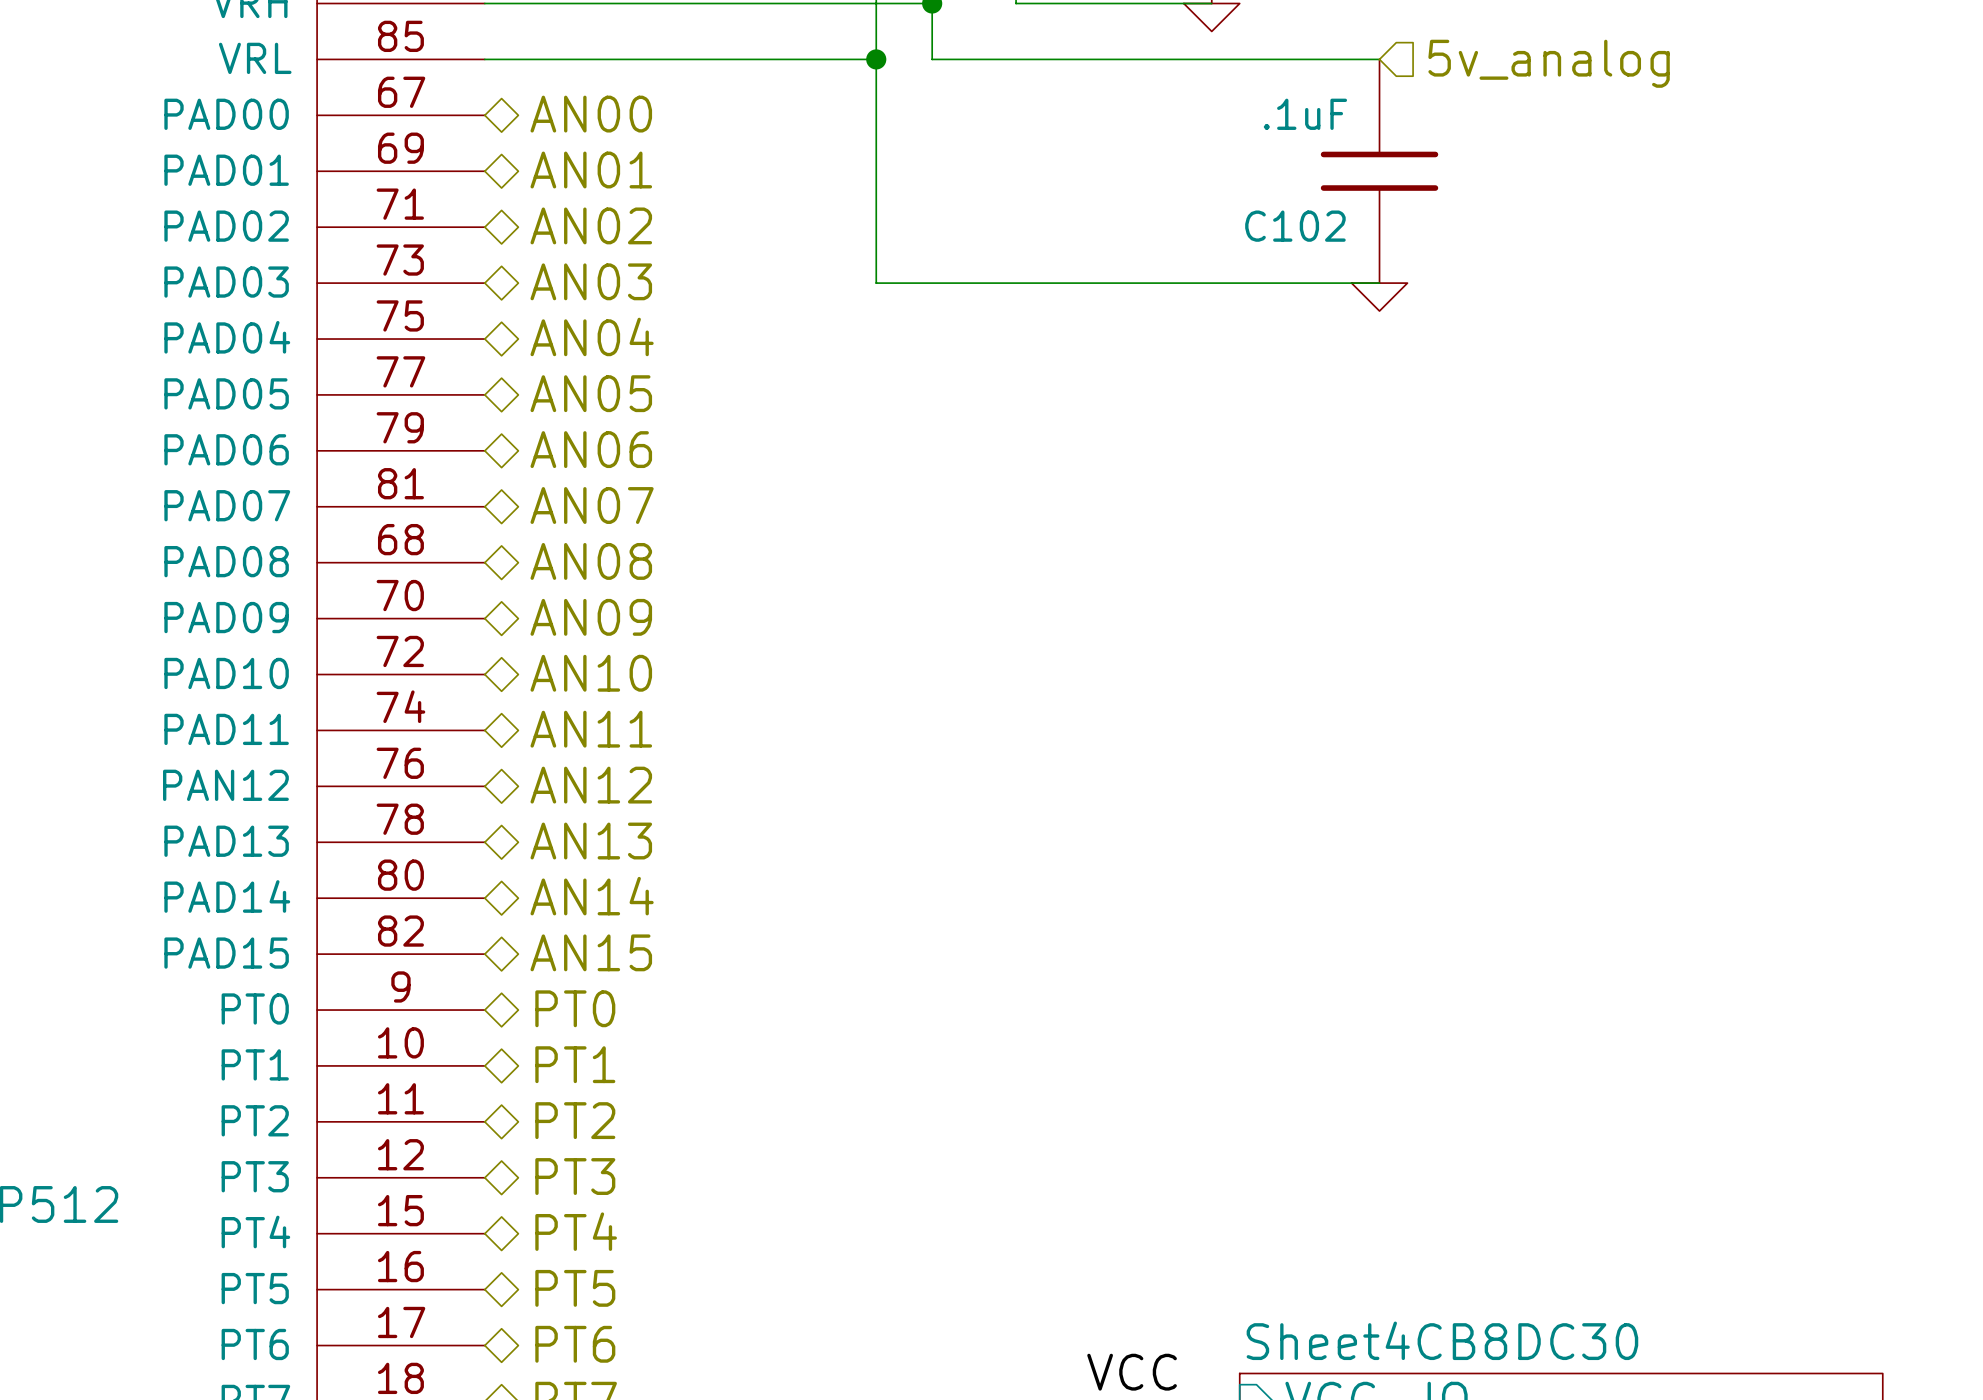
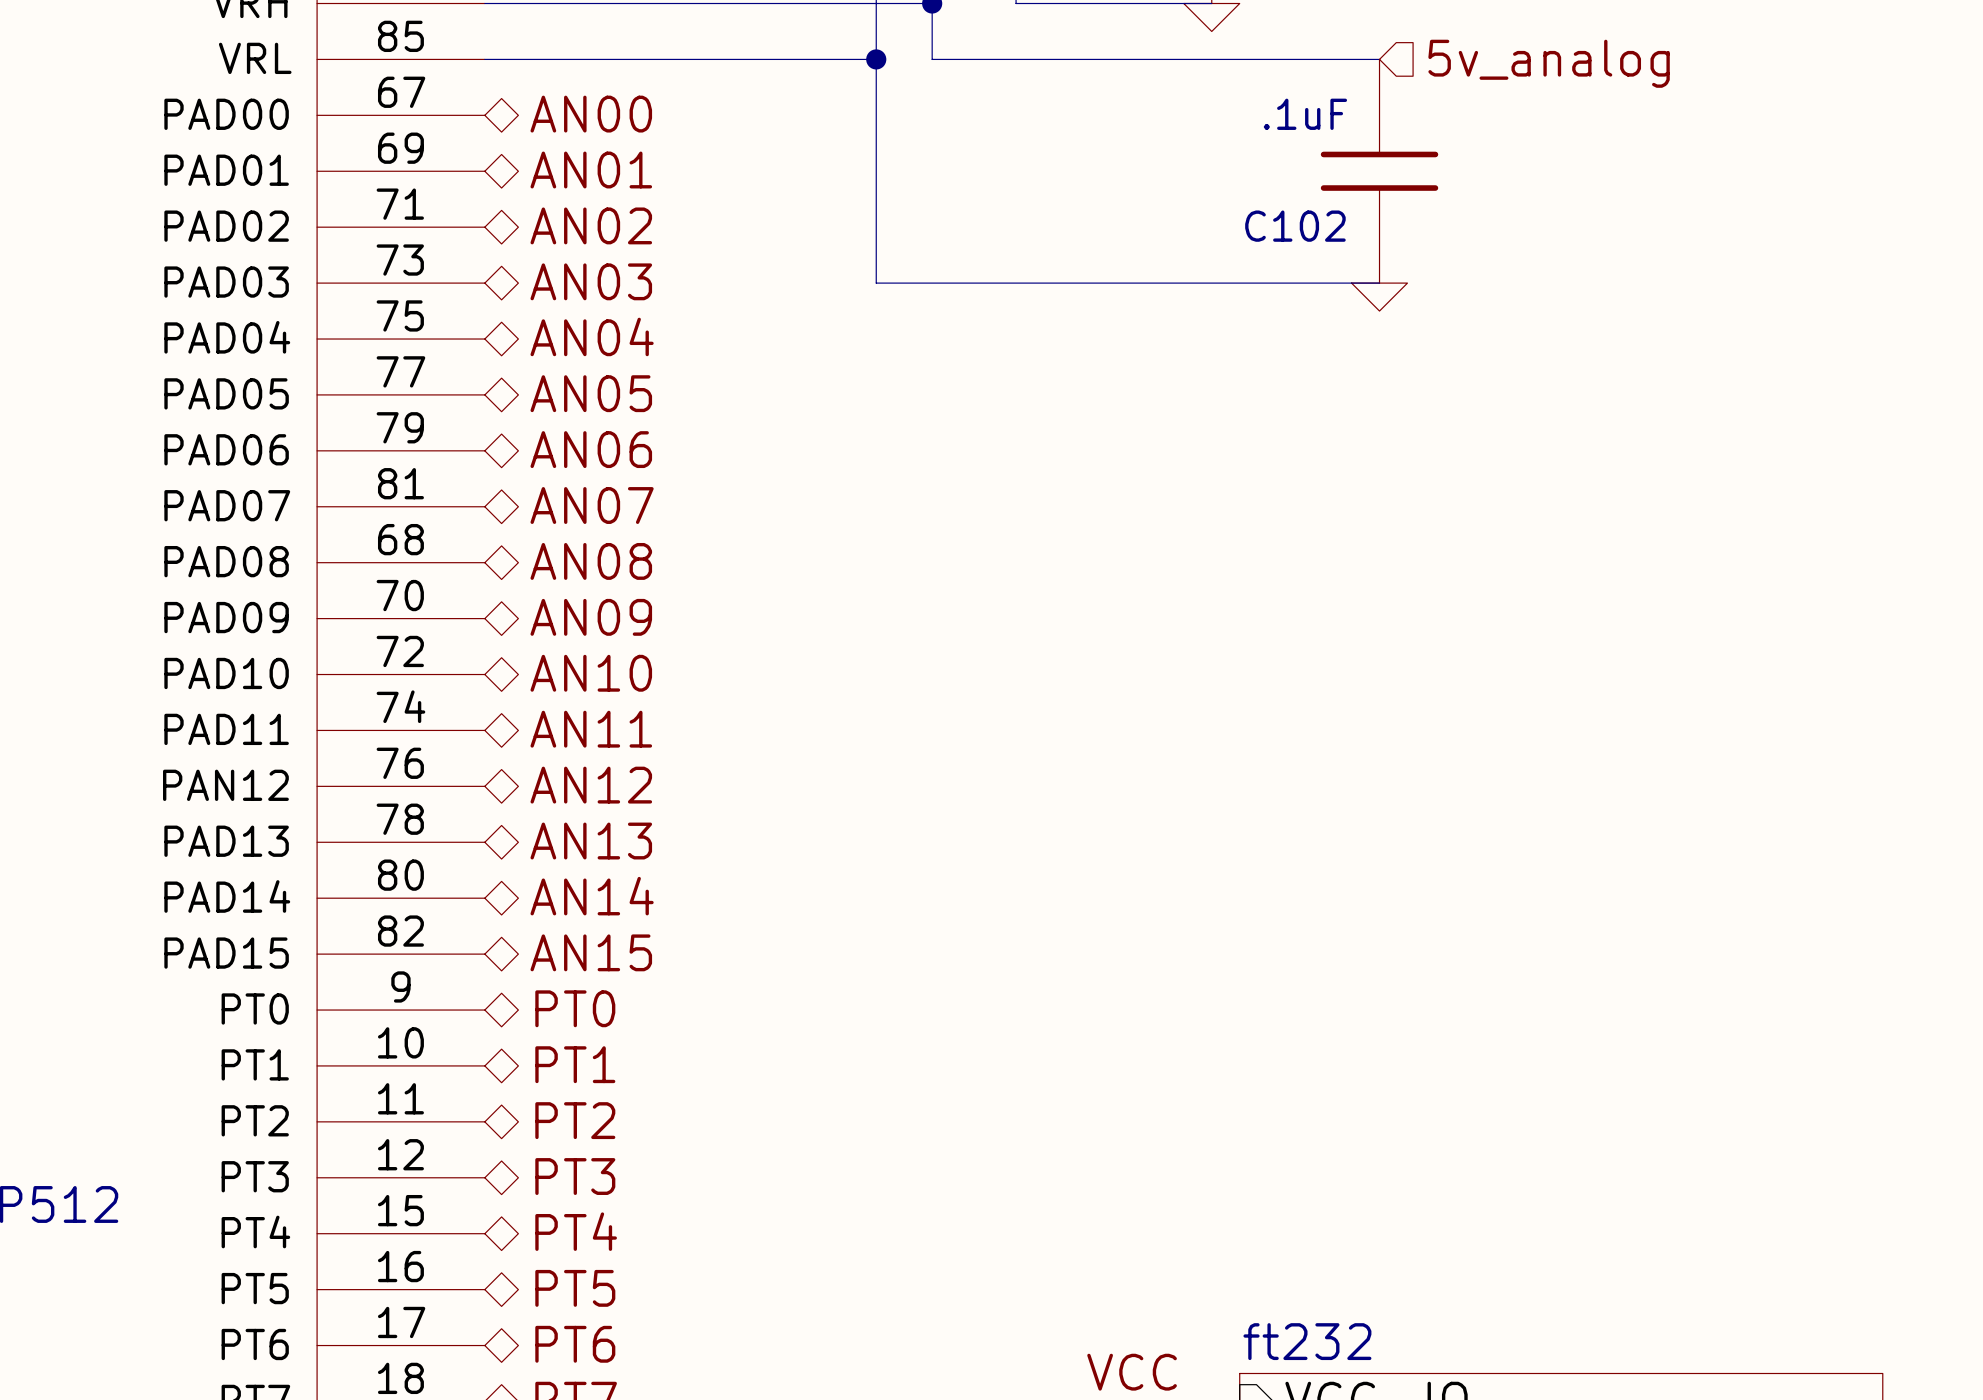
sheet Sheet4CB8DC30 name: Sheet4CB8DC30 (1442, 1340) -> ft232 (1307, 1341)

